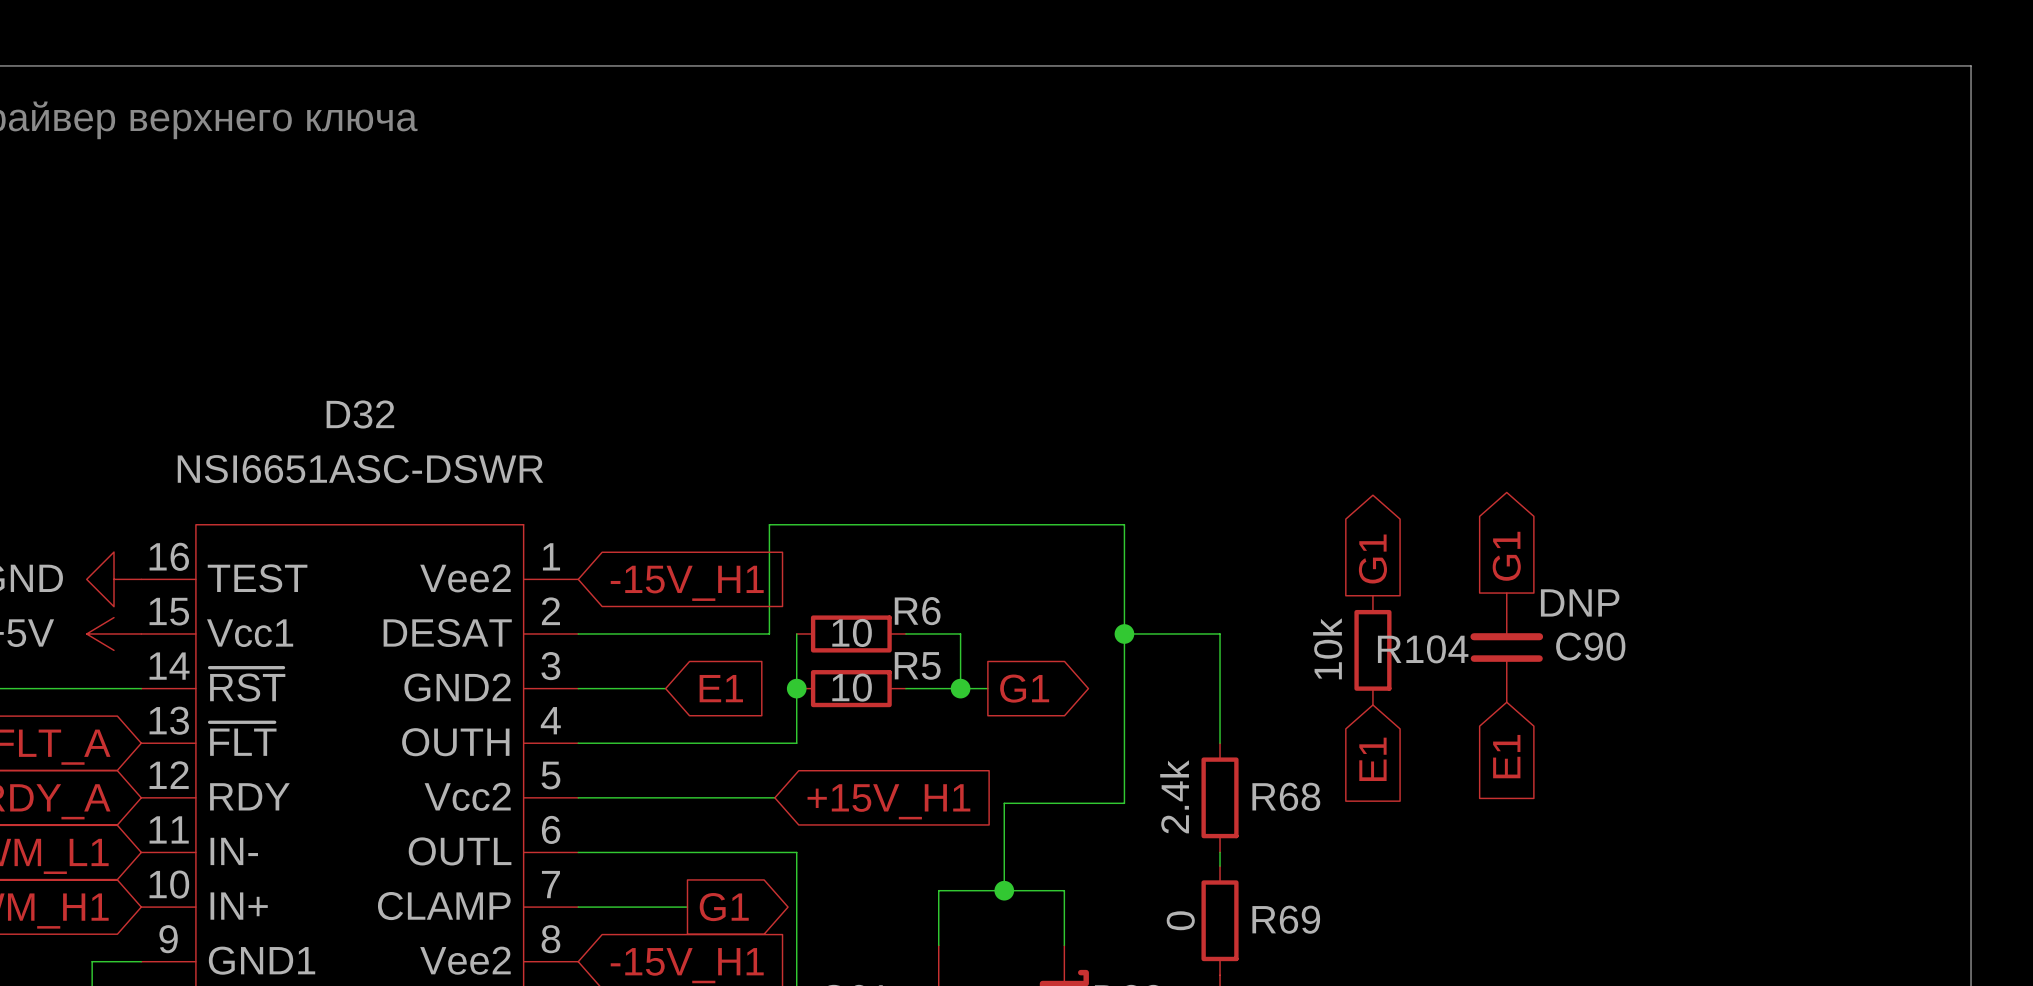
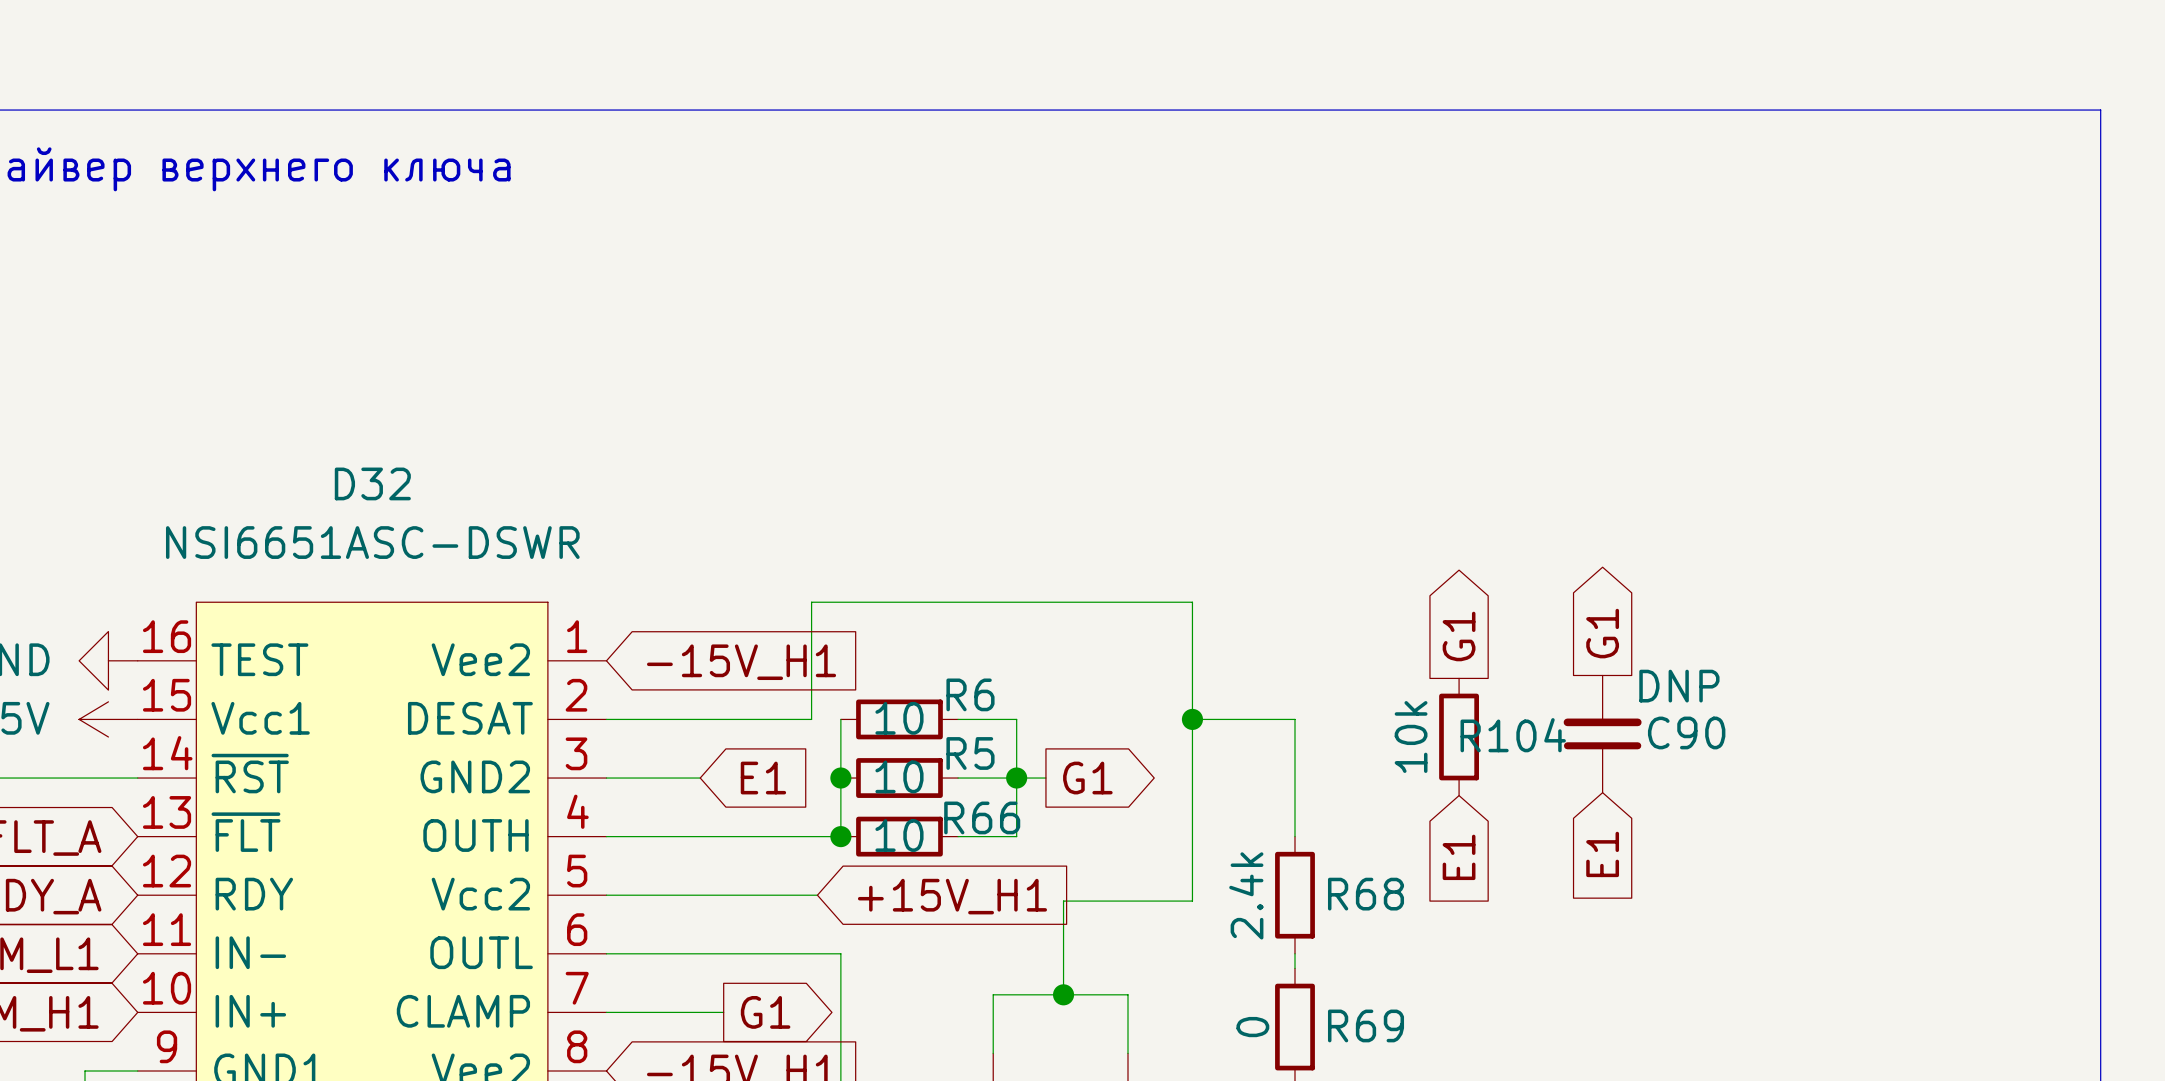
wire: none -> (1016, 778) (1016, 836) (958, 836)
junction: none -> (840, 836)
R66: none -> 10 (899, 836)

